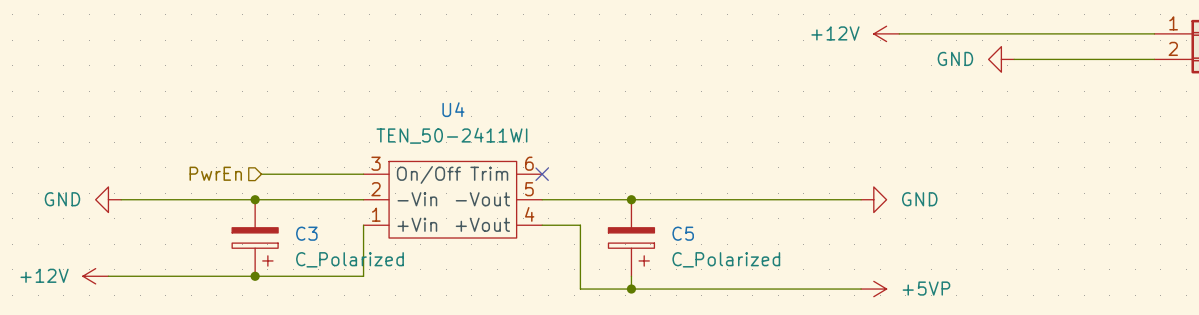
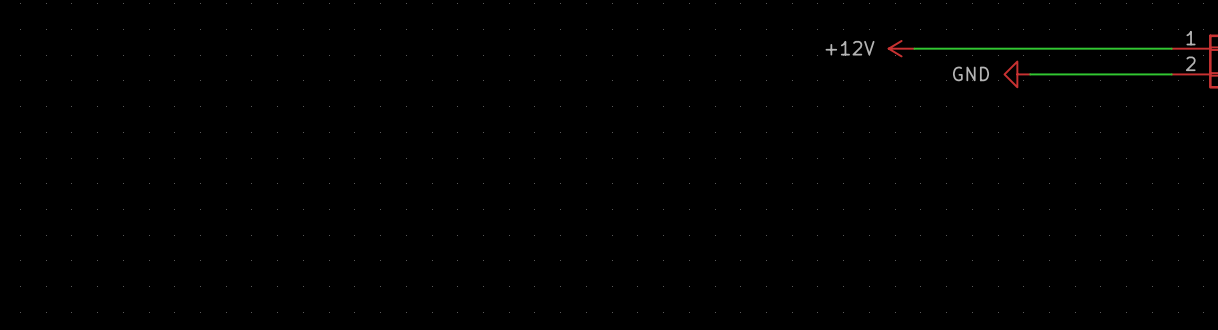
hierarchical label: PwrEn (215, 173) -> none
wire: (261, 174) (363, 174) -> none
no-connect mark: (542, 174) -> none
power symbol: GND (108, 199) -> none
wire: (121, 199) (363, 199) -> none
junction: (255, 199) -> none
U4: TEN_50-2411WI (452, 199) -> none
wire: (542, 199) (861, 199) -> none
junction: (631, 199) -> none
power symbol: GND (873, 199) -> none
wire: (363, 225) (363, 276) (108, 276) -> none
wire: (542, 225) (580, 225) (580, 289) (861, 289) -> none
C3: C_Polarized (255, 238) -> none
C5: C_Polarized (631, 238) -> none
power symbol: +12V (95, 276) -> none
junction: (255, 276) -> none
wire: (631, 276) (631, 289) -> none
junction: (631, 289) -> none
power symbol: +5VP (873, 289) -> none

